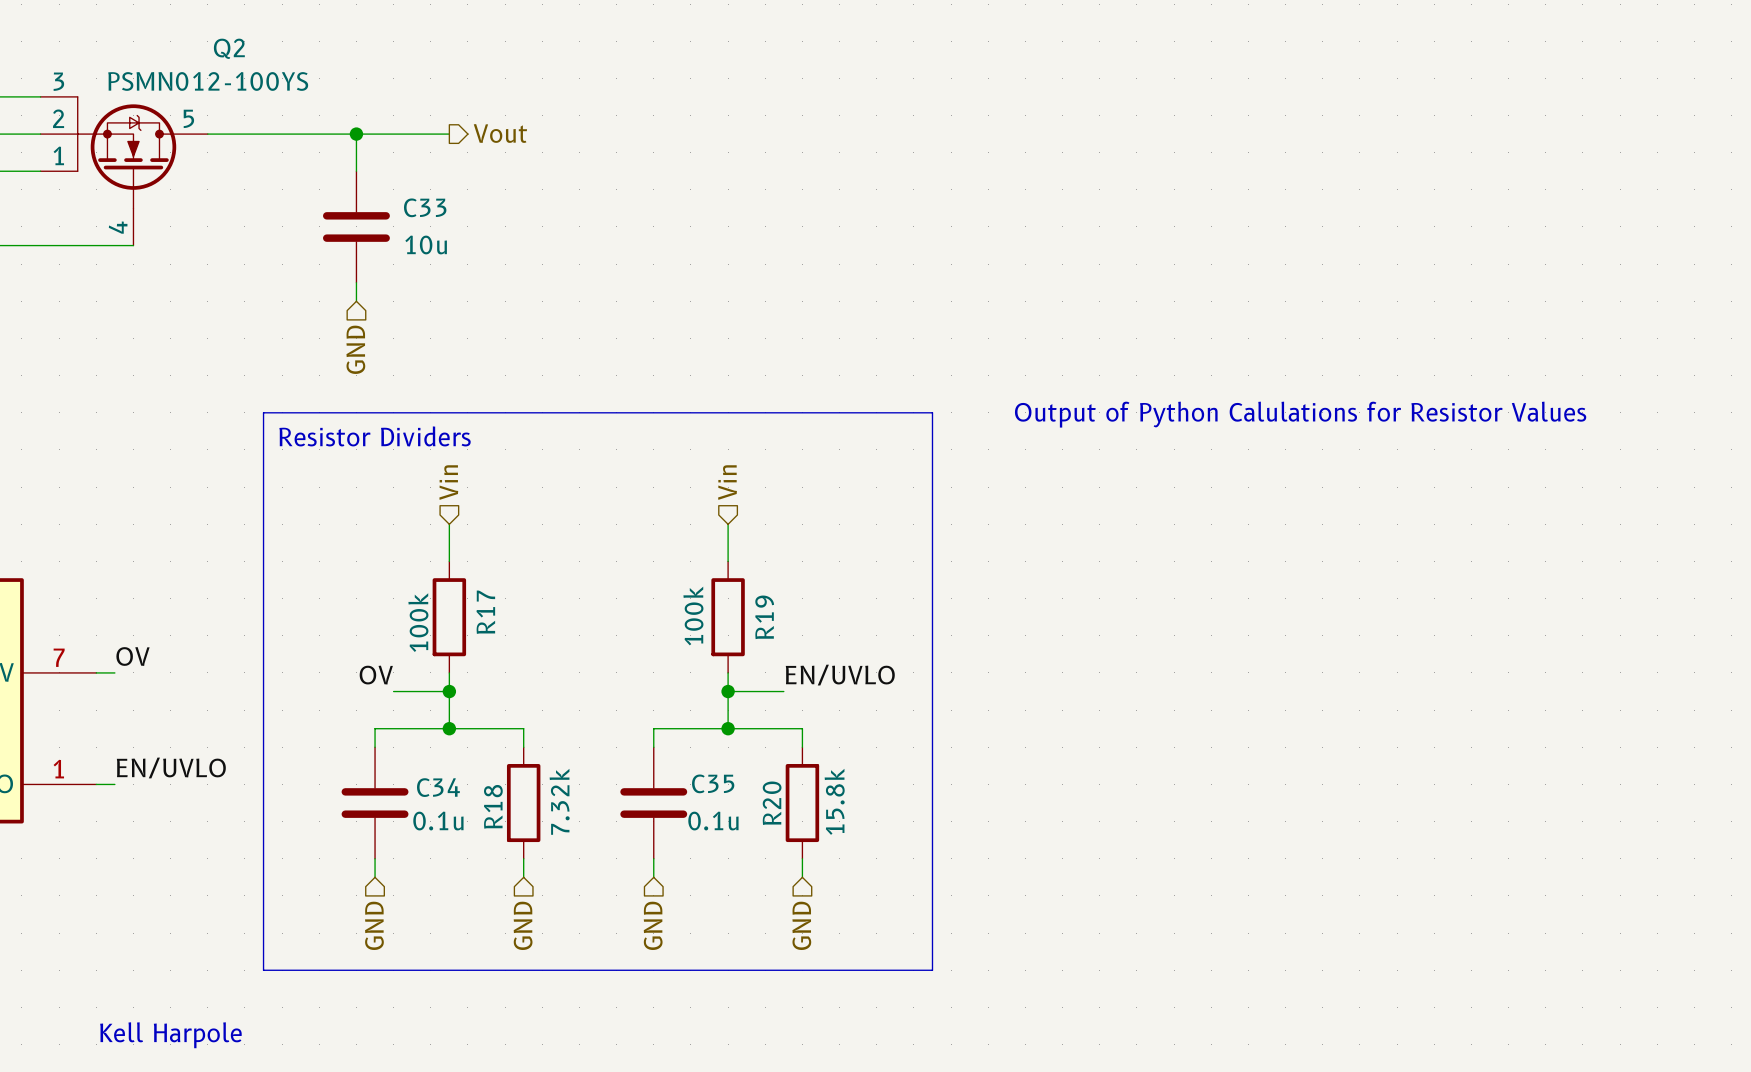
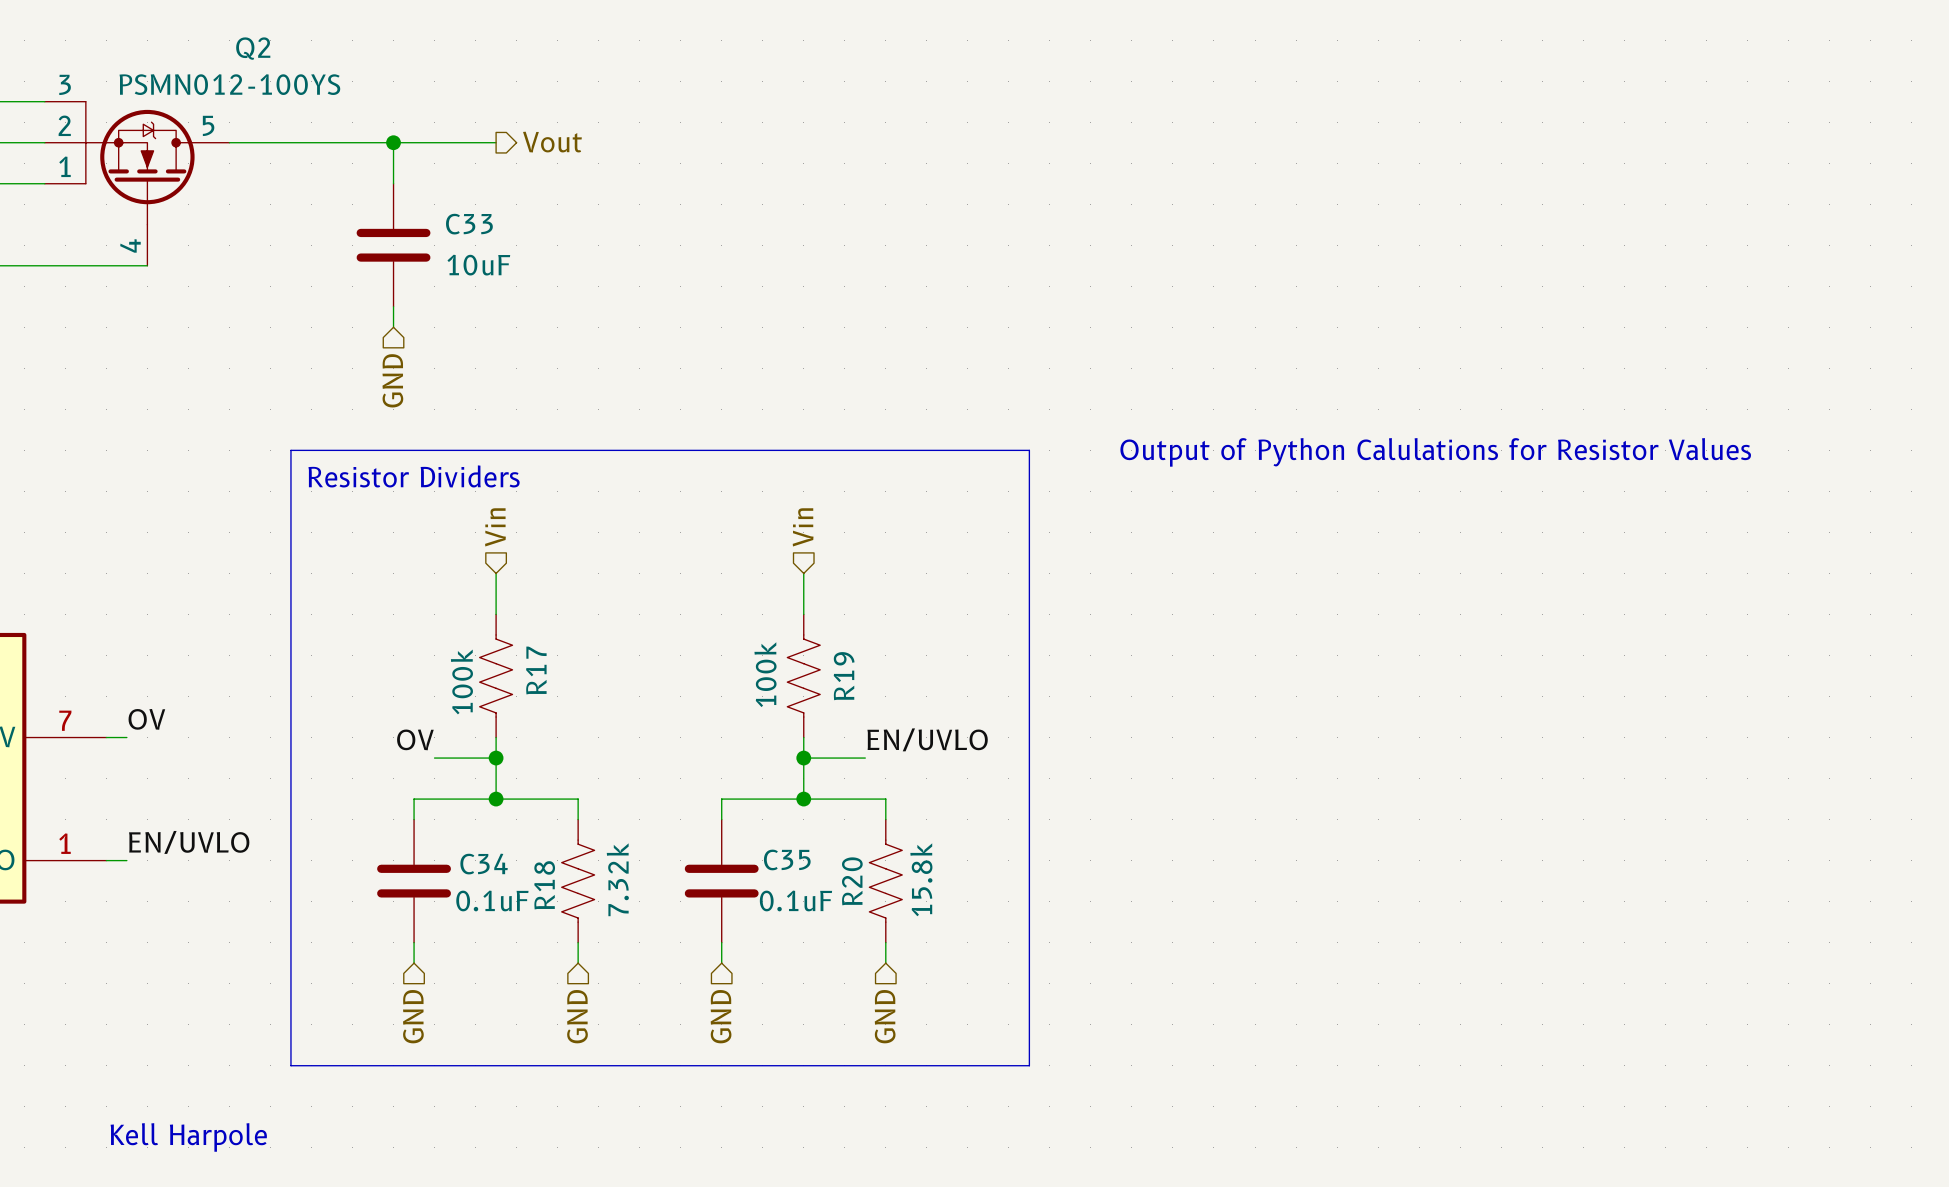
C33 value: 10u (426, 244) -> 10uF (478, 265)
R17 symbol: [432, 561, 467, 673] -> [479, 614, 513, 738]
R19 symbol: [711, 561, 745, 673] -> [787, 614, 821, 738]
R18 symbol: [506, 747, 541, 859] -> [561, 819, 595, 943]
R20 symbol: [785, 747, 820, 859] -> [869, 819, 903, 943]
C34 value: 0.1u (438, 821) -> 0.1uF (492, 900)
C35 value: 0.1u (713, 821) -> 0.1uF (795, 900)

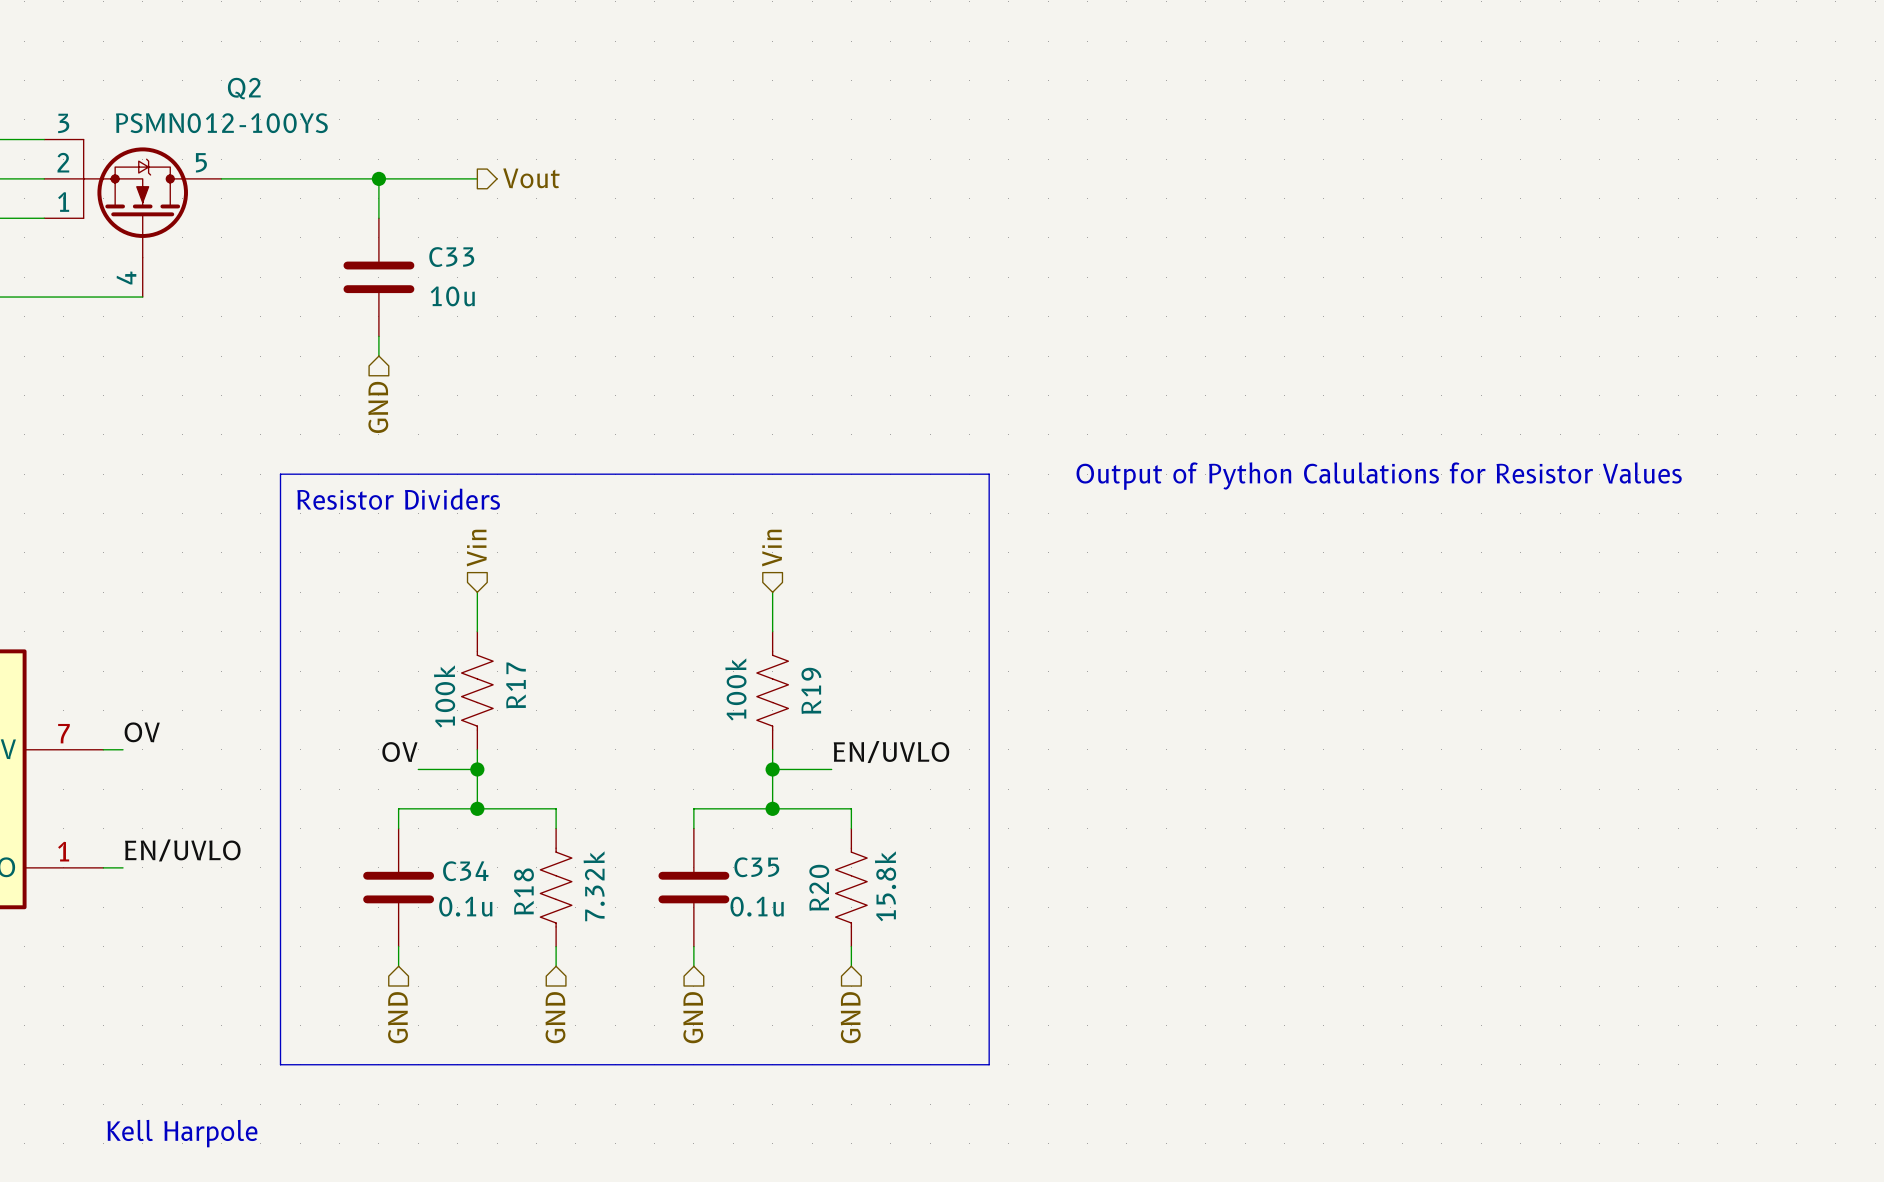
C33 value: 10uF (478, 265) -> 10u (452, 296)
C34 value: 0.1uF (492, 900) -> 0.1u (465, 906)
C35 value: 0.1uF (795, 900) -> 0.1u (757, 906)

